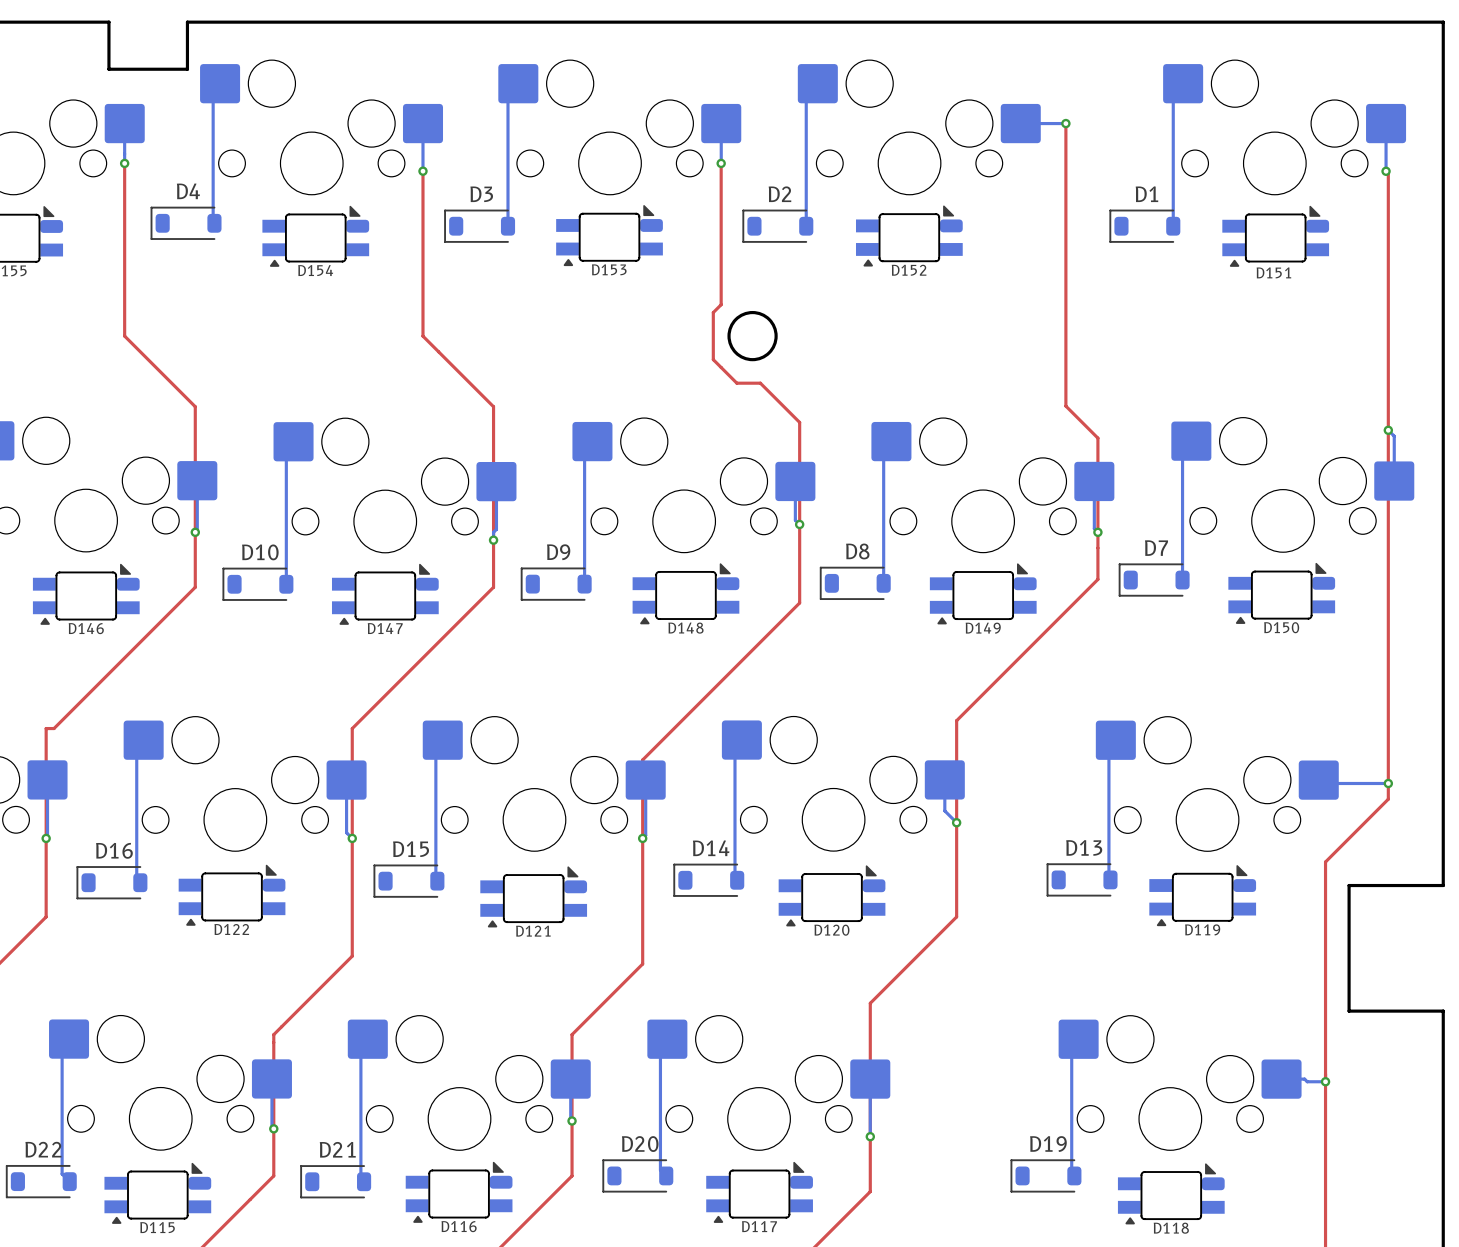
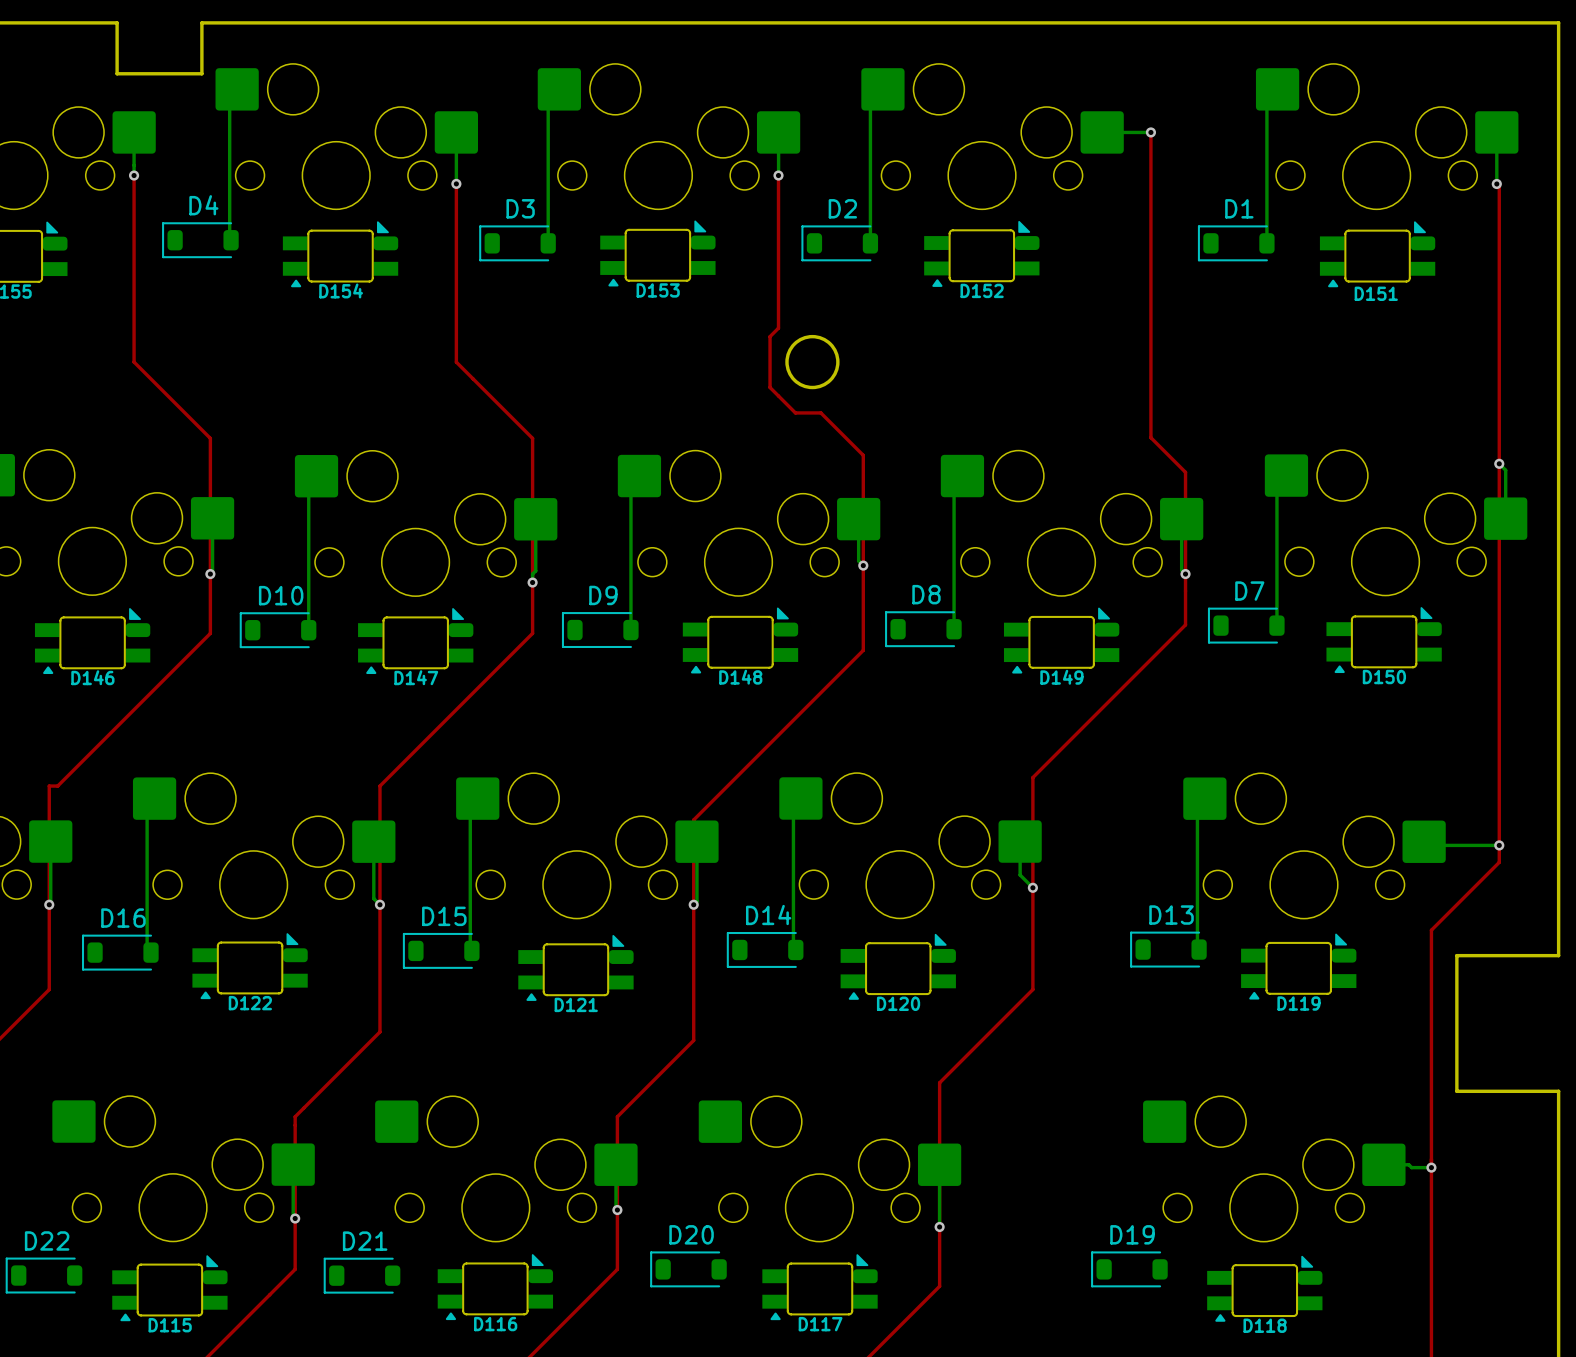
bottom track: (69, 1039) (62, 1045) (62, 1174) (69, 1181) -> none
bottom track: (367, 1039) (360, 1046) (360, 1178) (364, 1181) -> none
bottom track: (667, 1039) (660, 1046) (660, 1170) (666, 1175) -> none
bottom track: (1078, 1039) (1071, 1046) (1071, 1173) (1074, 1175) -> none

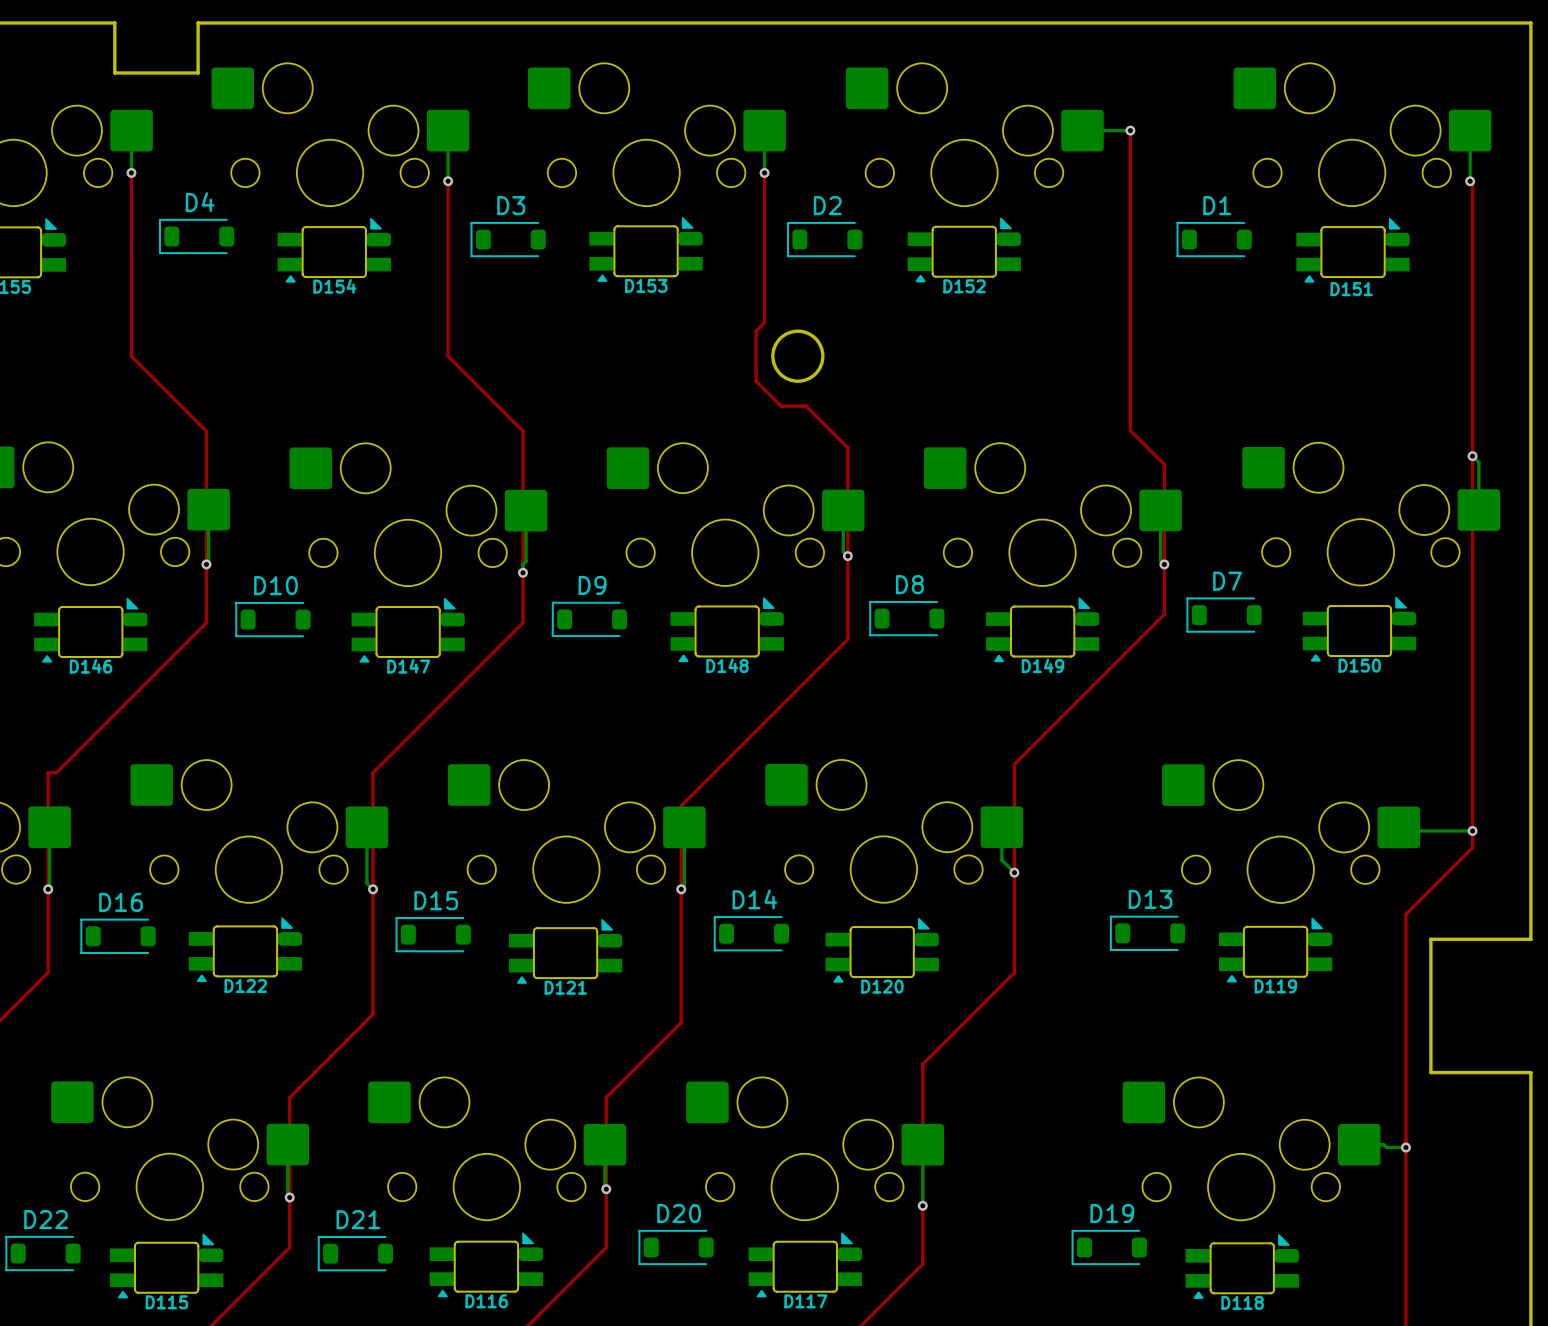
bottom track: (237, 89) (229, 96) (231, 240) -> none
bottom track: (559, 89) (548, 100) (548, 243) -> none
bottom track: (882, 89) (870, 101) (870, 243) -> none
bottom track: (1277, 89) (1266, 100) (1266, 243) -> none
bottom track: (1286, 475) (1276, 485) (1276, 625) -> none
bottom track: (316, 476) (308, 483) (308, 630) -> none
bottom track: (639, 476) (630, 484) (630, 630) -> none
bottom track: (962, 476) (954, 484) (954, 629) -> none
bottom track: (154, 798) (147, 806) (147, 948) (151, 952) -> none
bottom track: (477, 798) (470, 806) (470, 949) (471, 950) -> none
bottom track: (800, 798) (793, 805) (793, 947) (795, 949) -> none
bottom track: (1204, 798) (1197, 806) (1197, 950) (1199, 952) (1199, 949) -> none

